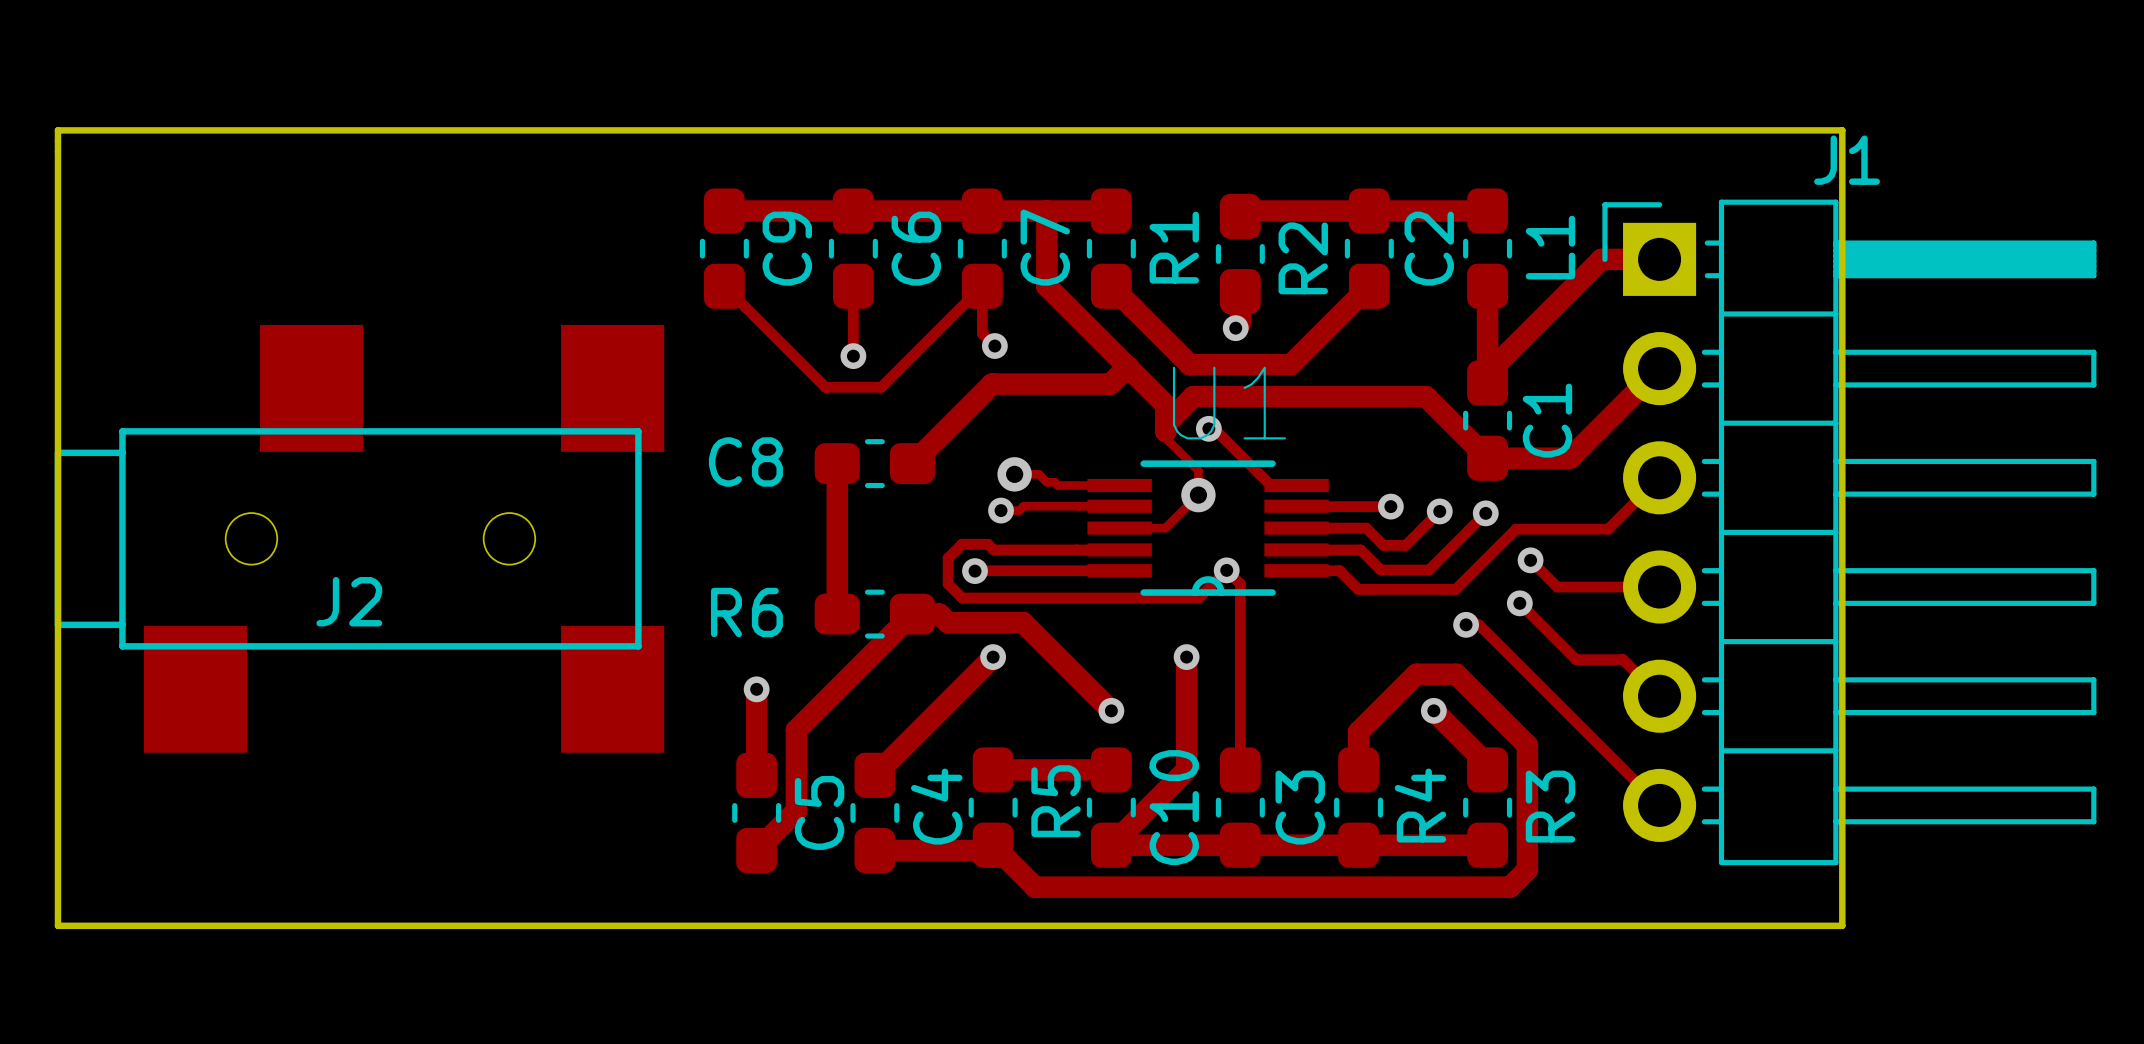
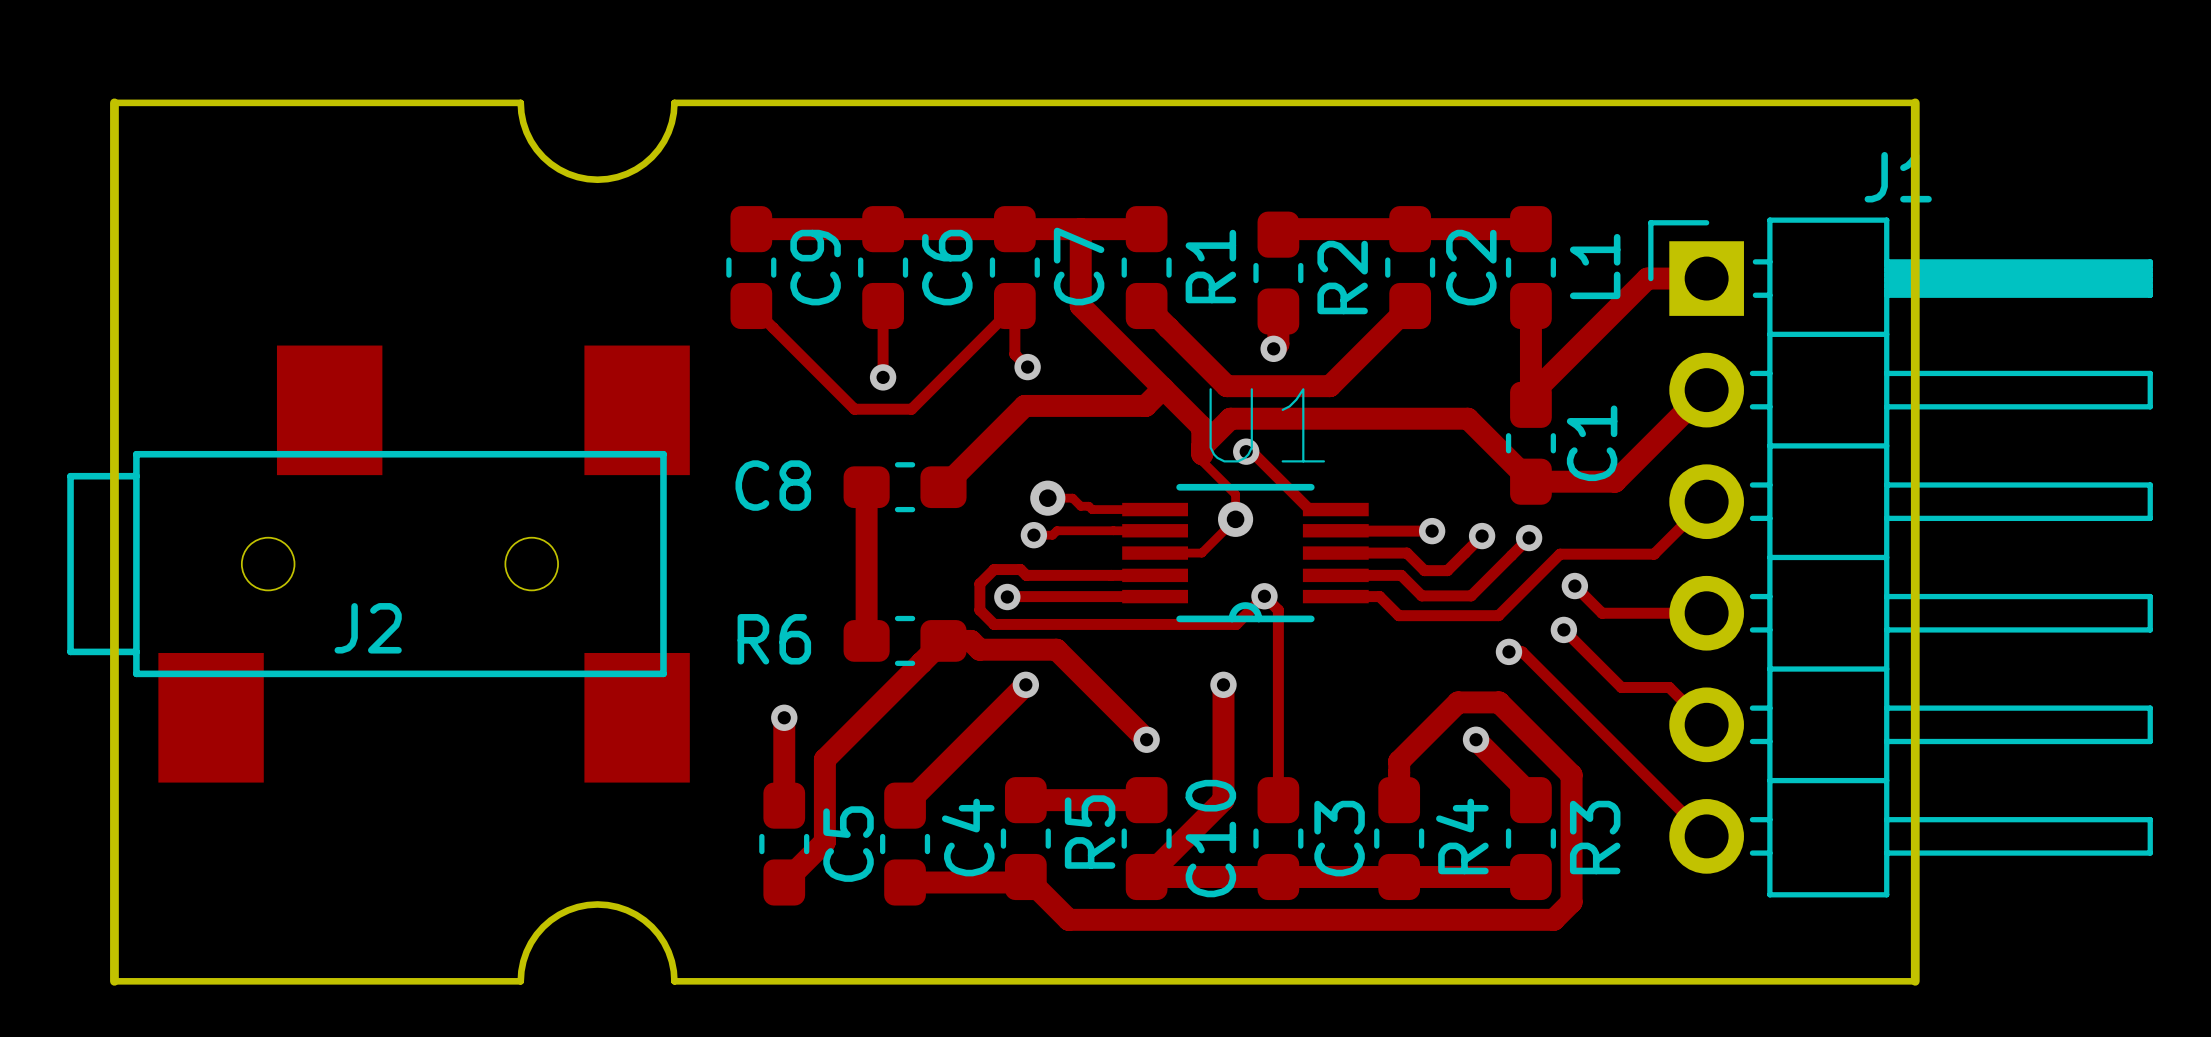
board edge: (57, 130) (1842, 130) (1842, 925) (57, 925) (57, 130) -> (114, 102) (114, 981) (520, 981) (526, 951) (543, 926) (568, 910) (597, 904) (627, 910) (651, 926) (668, 951) (674, 981) (1915, 981) (1915, 102) (674, 102) (668, 132) (651, 157) (627, 173) (597, 179) (568, 173) (543, 157) (526, 132) (520, 102) (114, 102)

